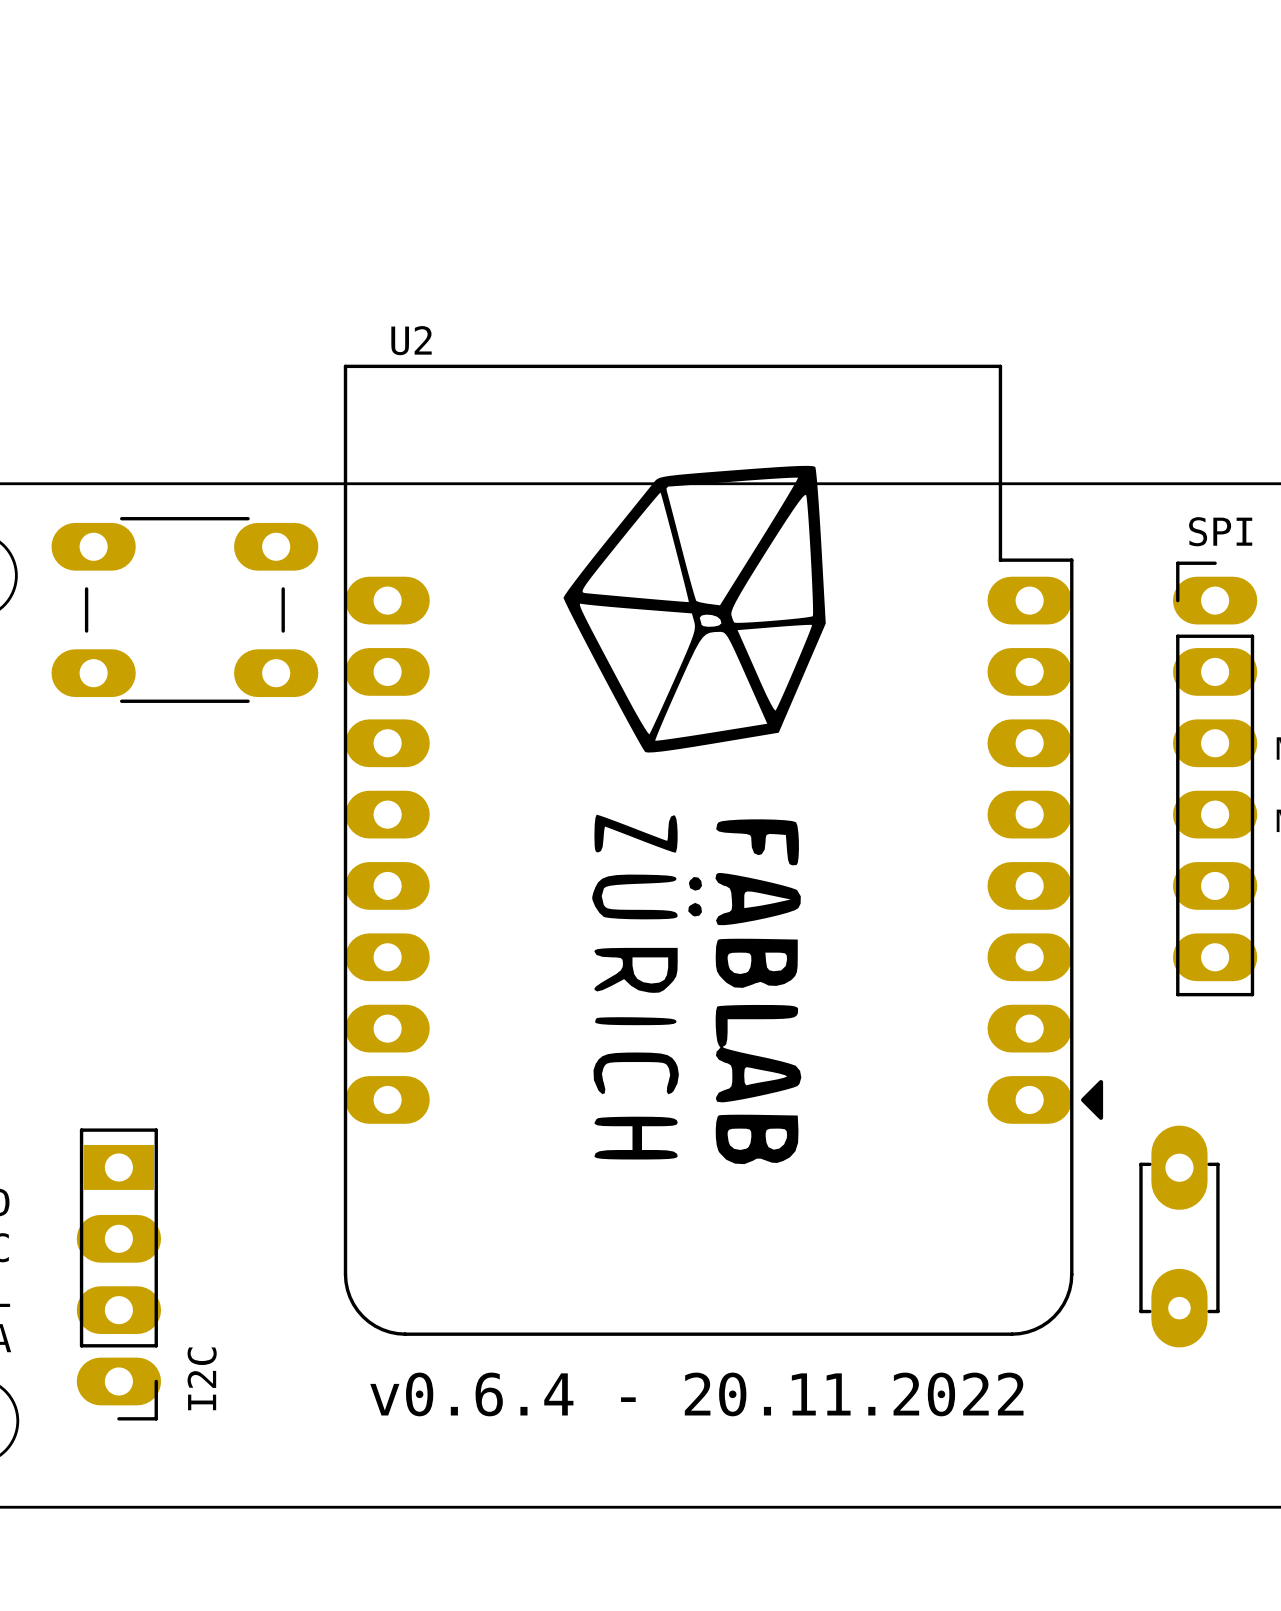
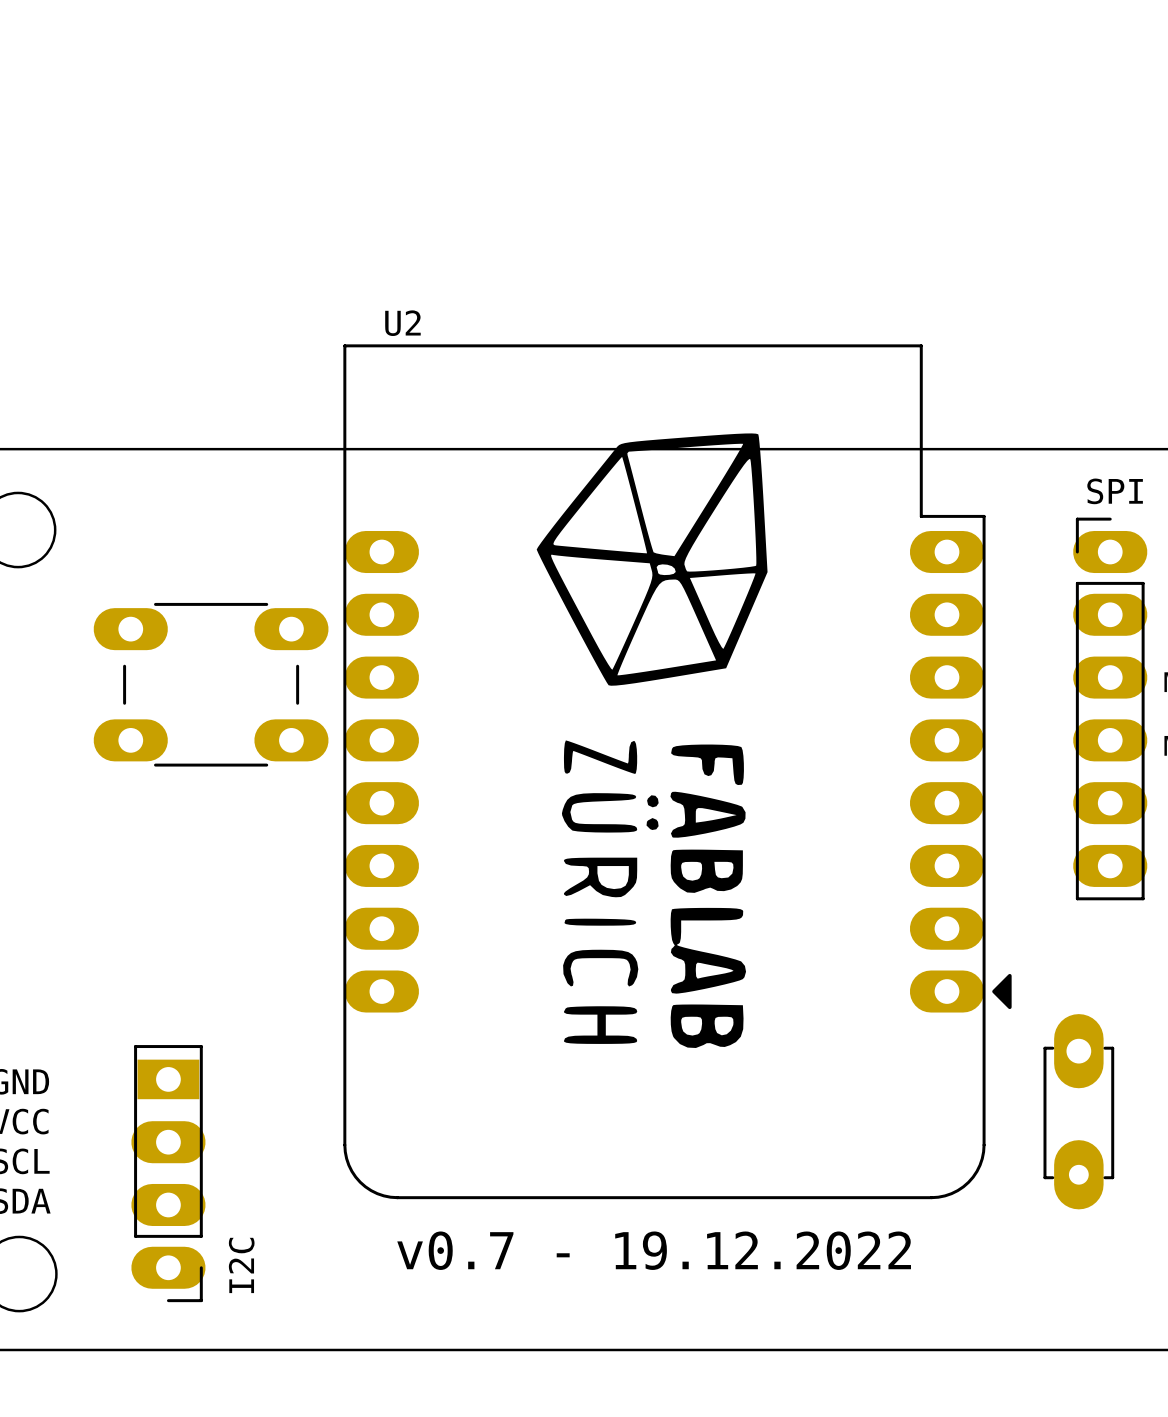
part position: (184, 609) -> (211, 684)
part position: (118, 1274) -> (168, 1173)
text: v0.6.4 - 20.11.2022 (696, 1394) -> v0.7 - 19.12.2022 (654, 1250)

